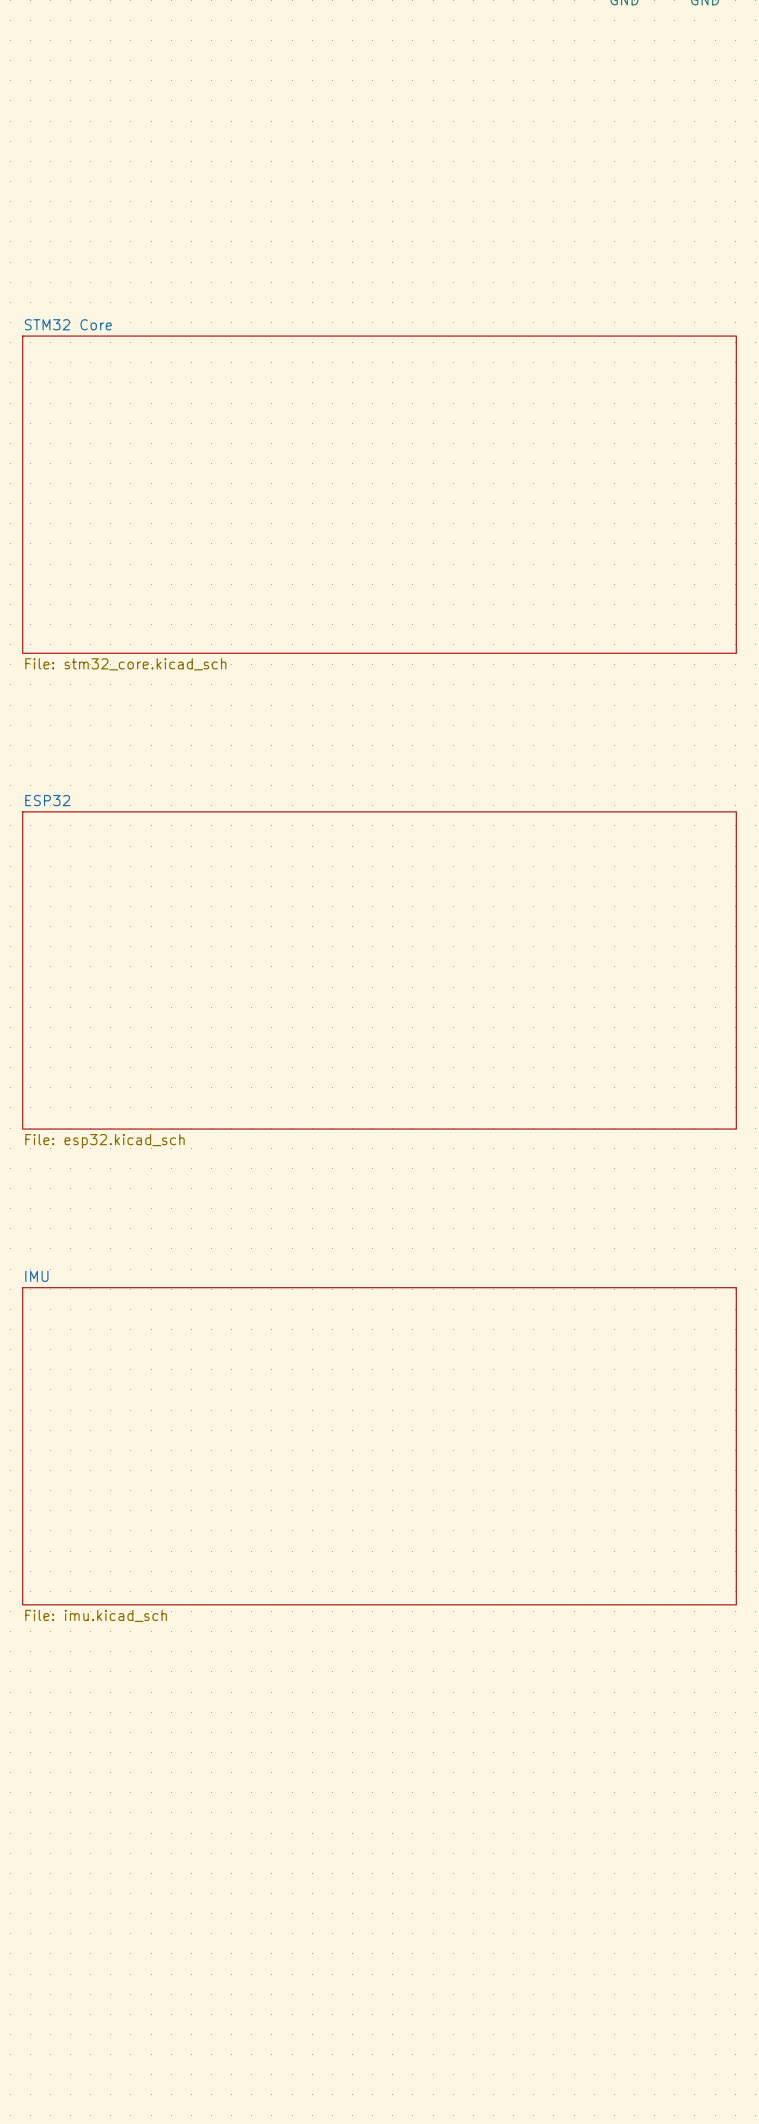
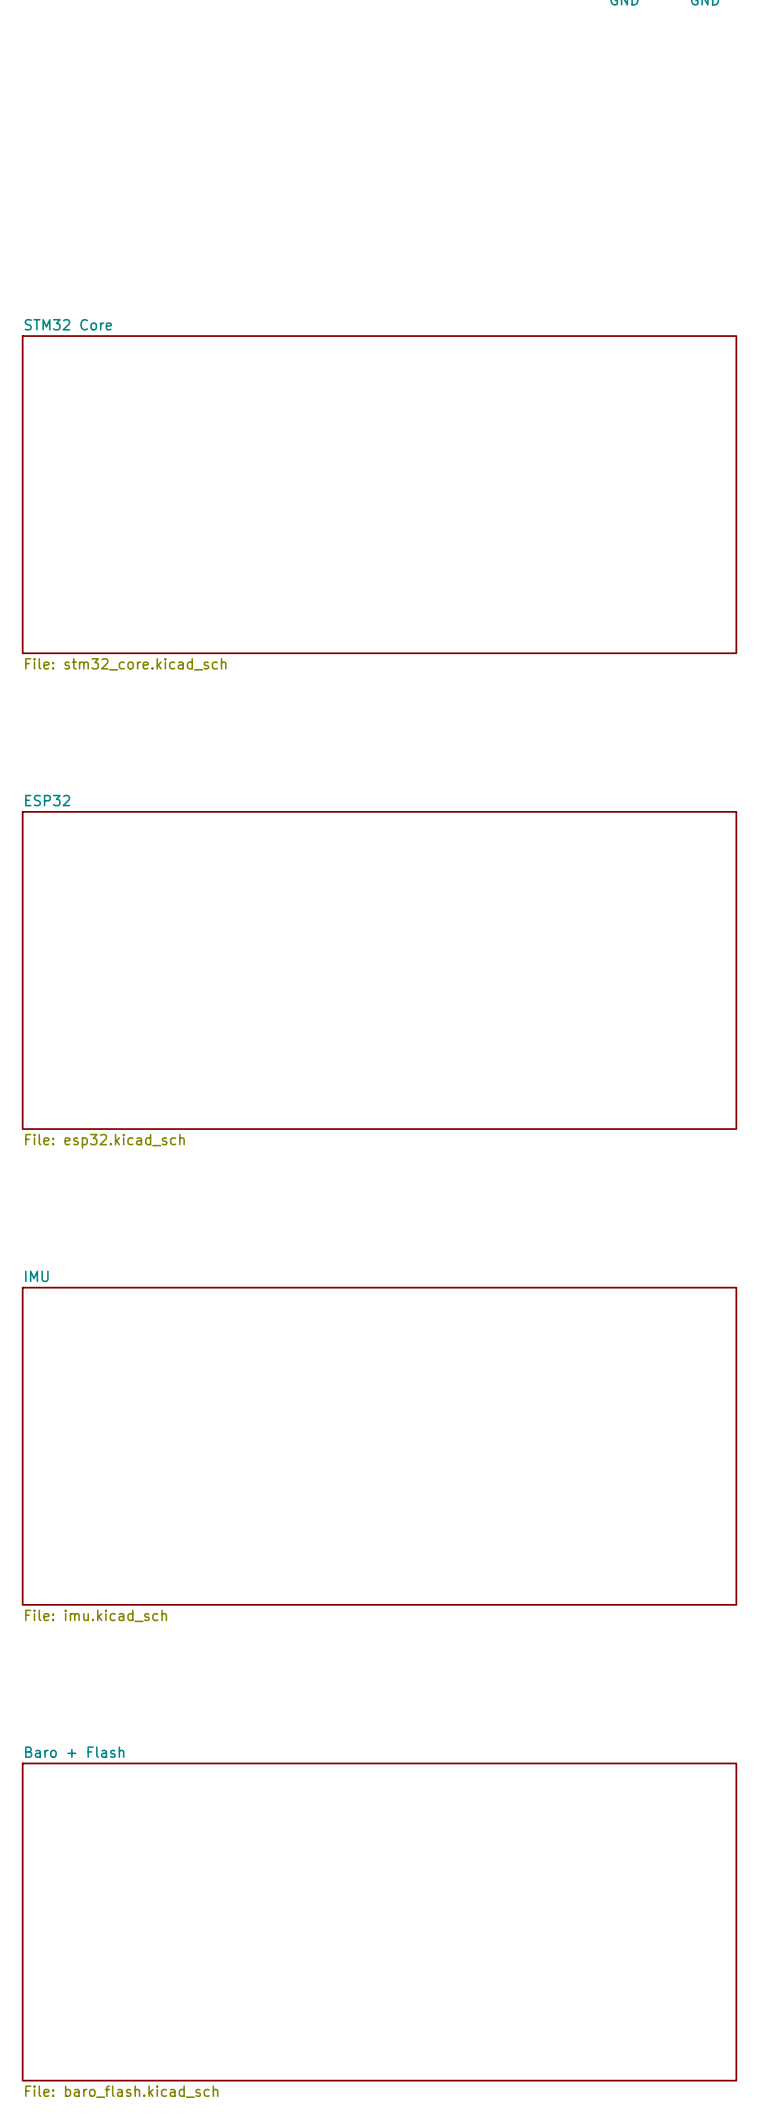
sheet Baro + Flash: none -> File: baro_flash.kicad_sch (379, 1922)

